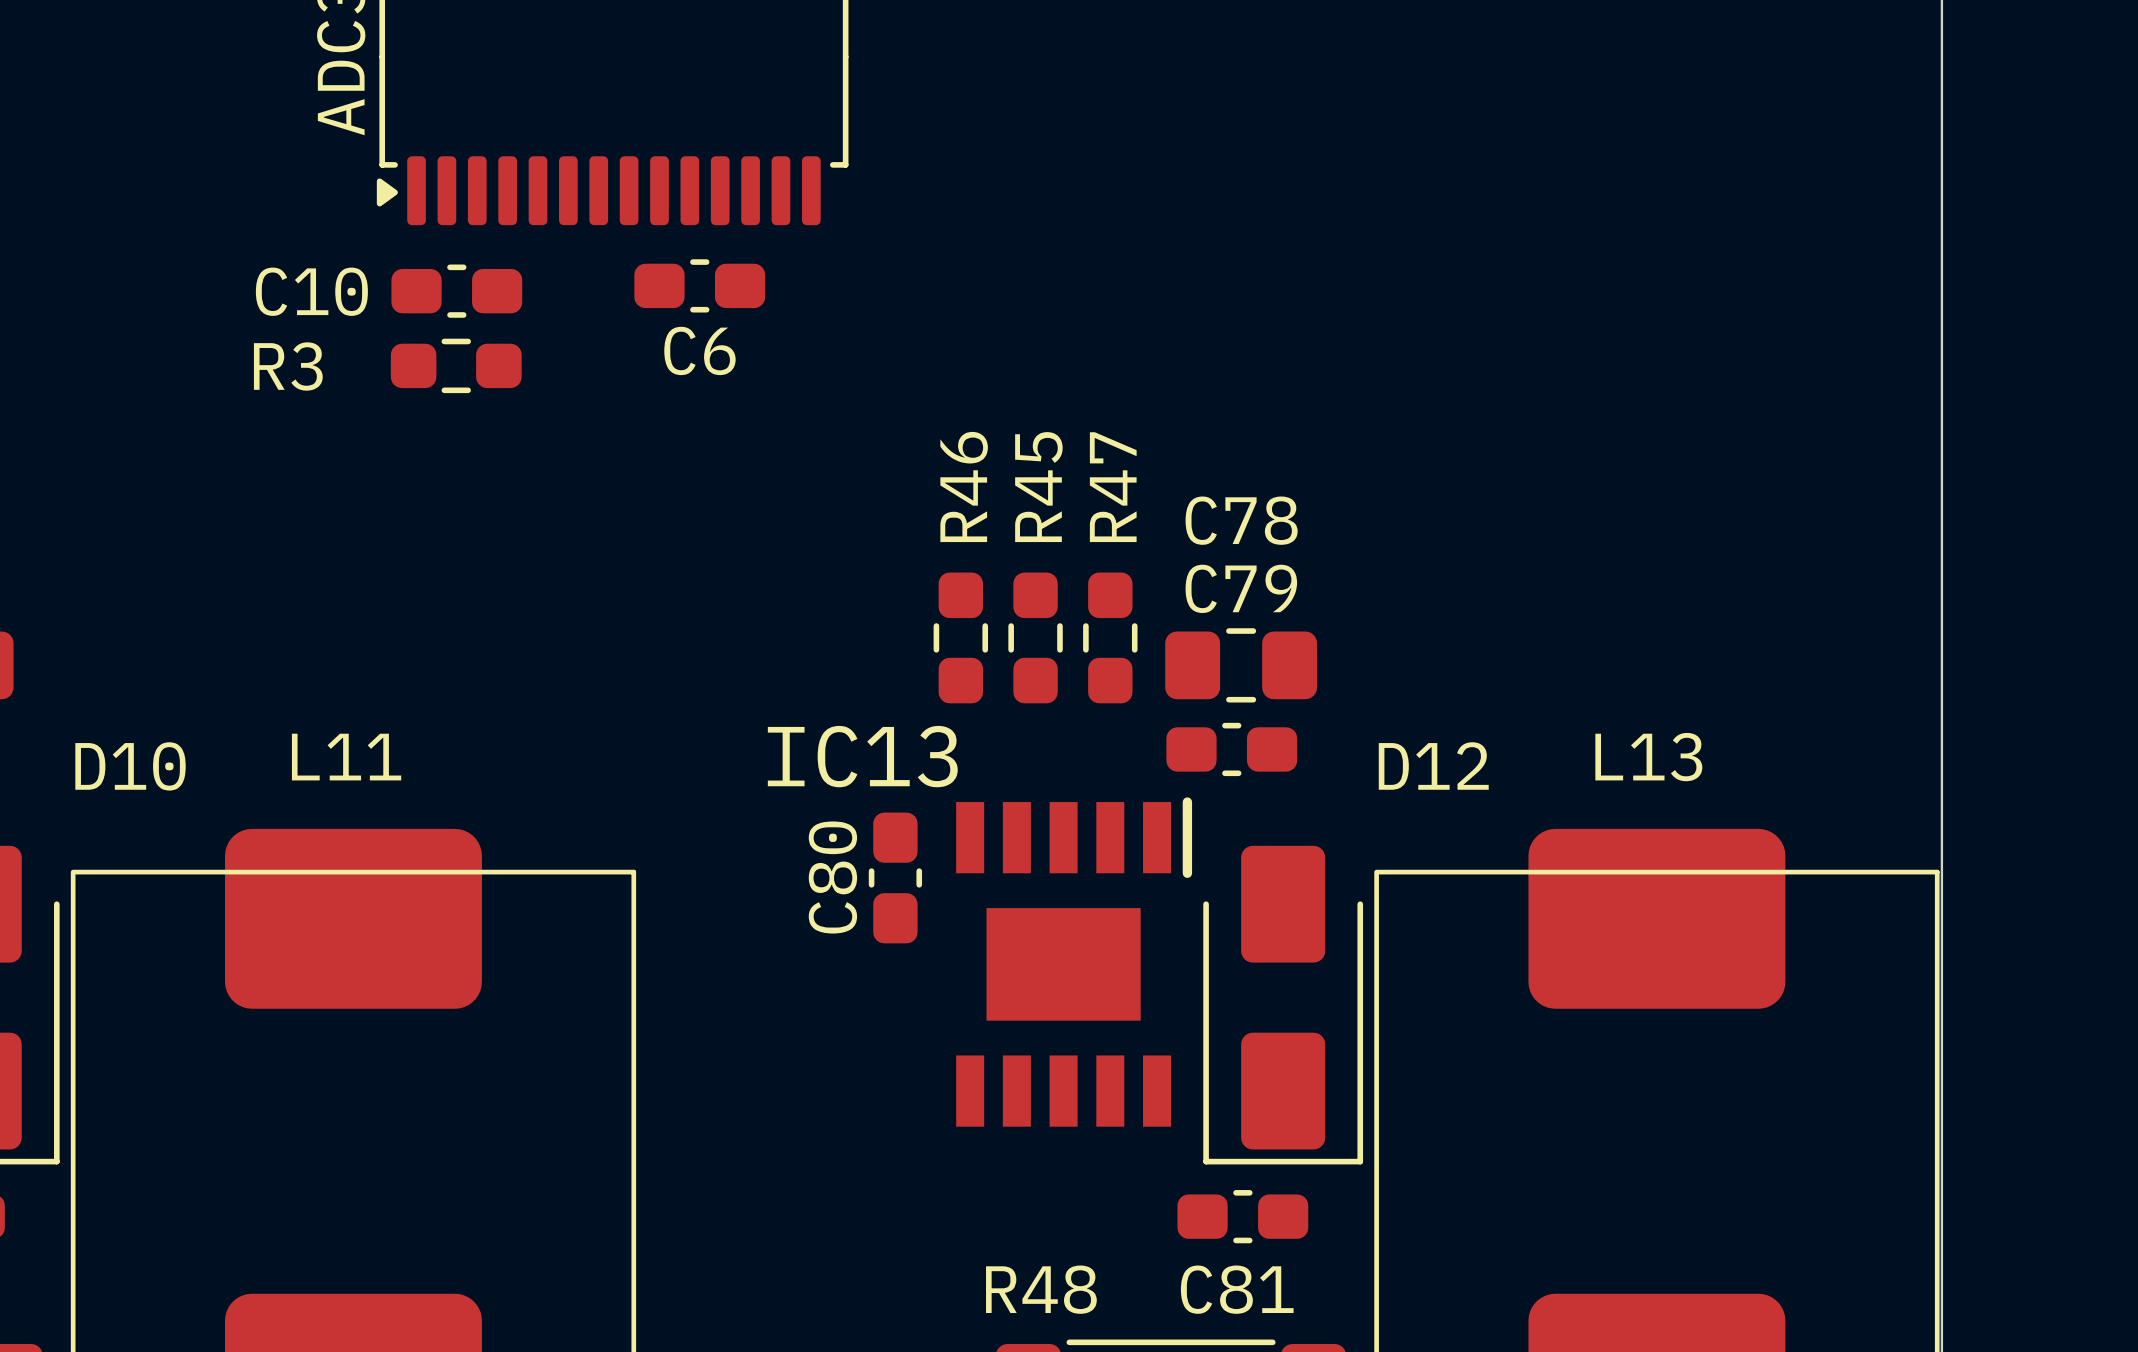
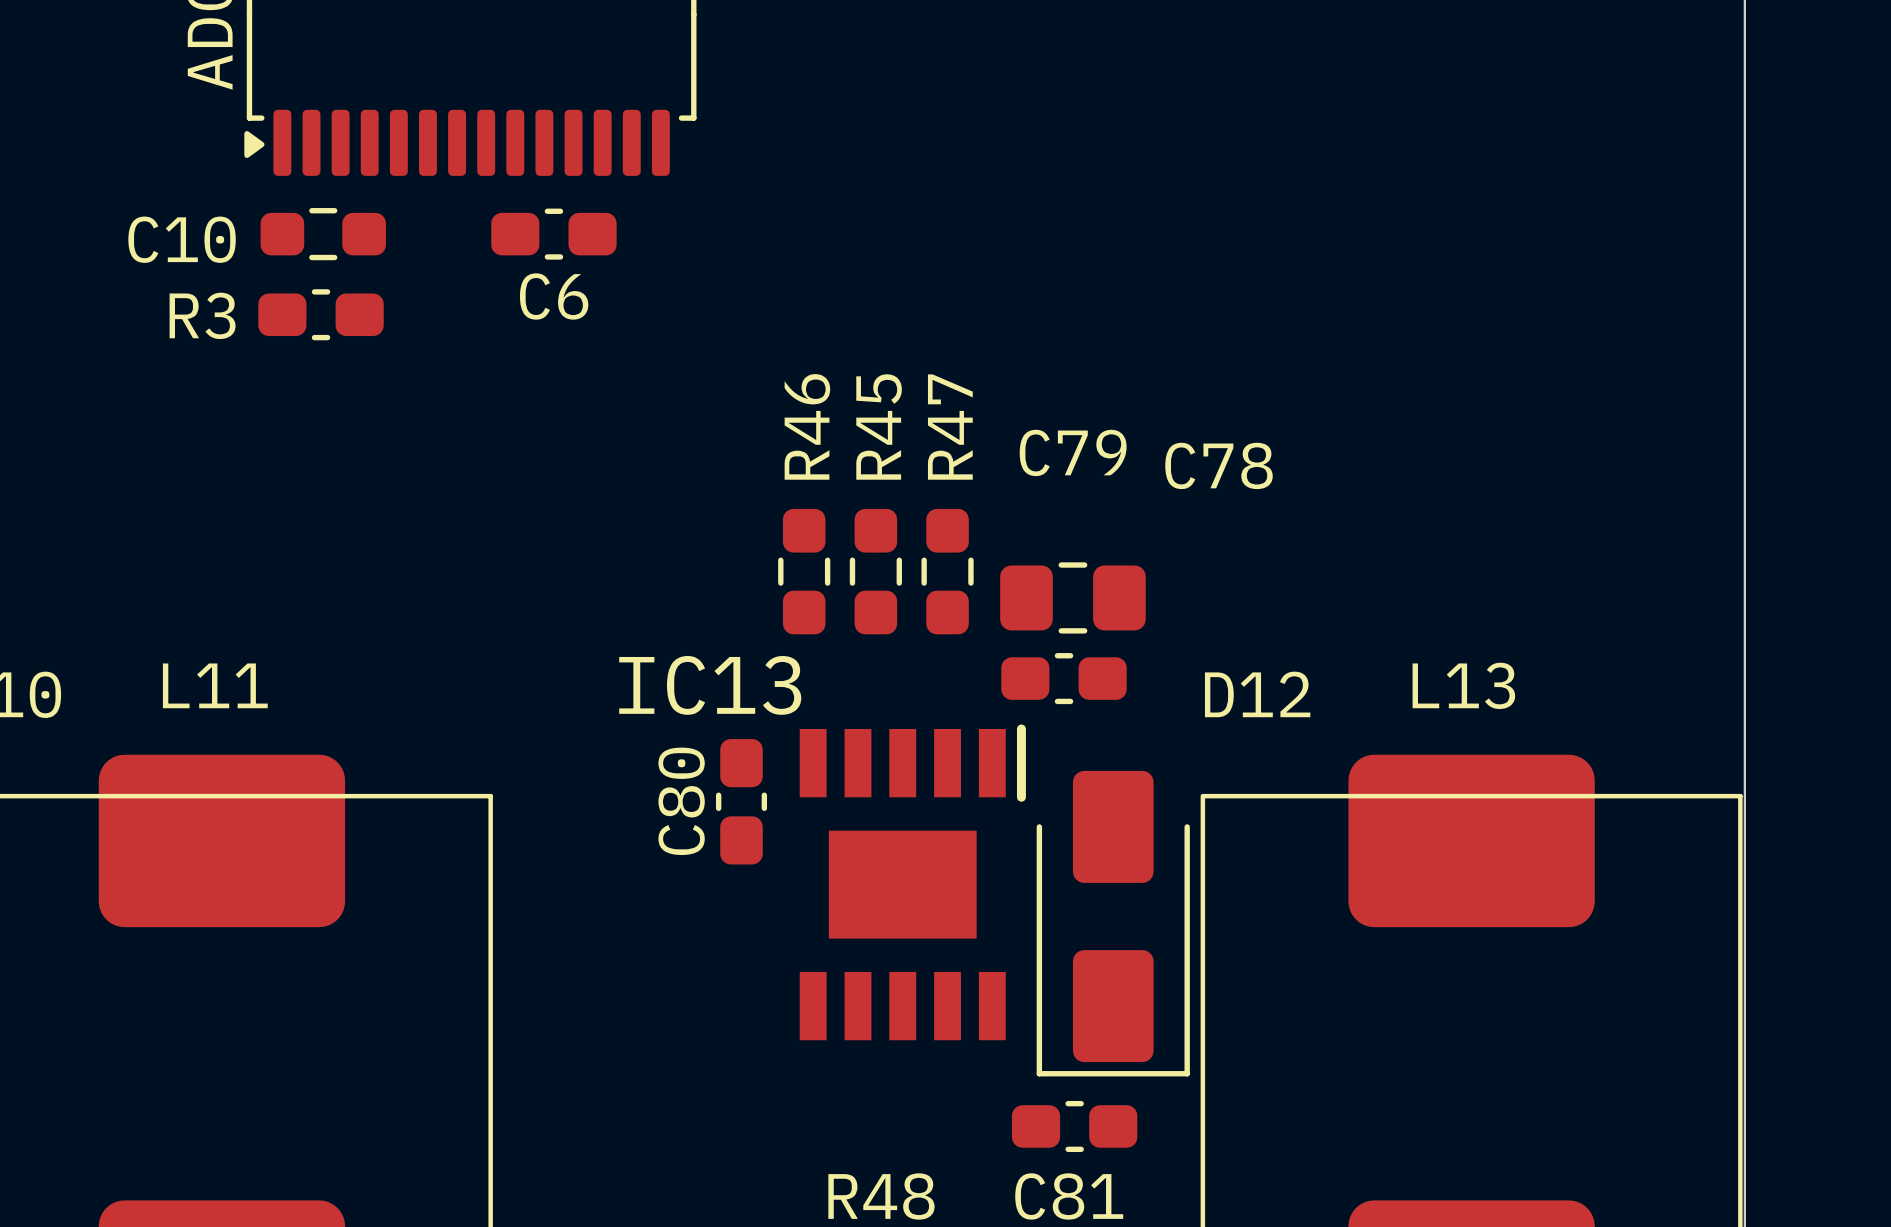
C10 position: (456, 291) -> (321, 314)
R3 position: (456, 365) -> (323, 234)
R3 name position: R3 (288, 366) -> R3 (202, 315)
C78 name position: C78 (1241, 520) -> C78 (1219, 465)
C79 name position: C79 (1241, 588) -> C79 (1073, 452)

